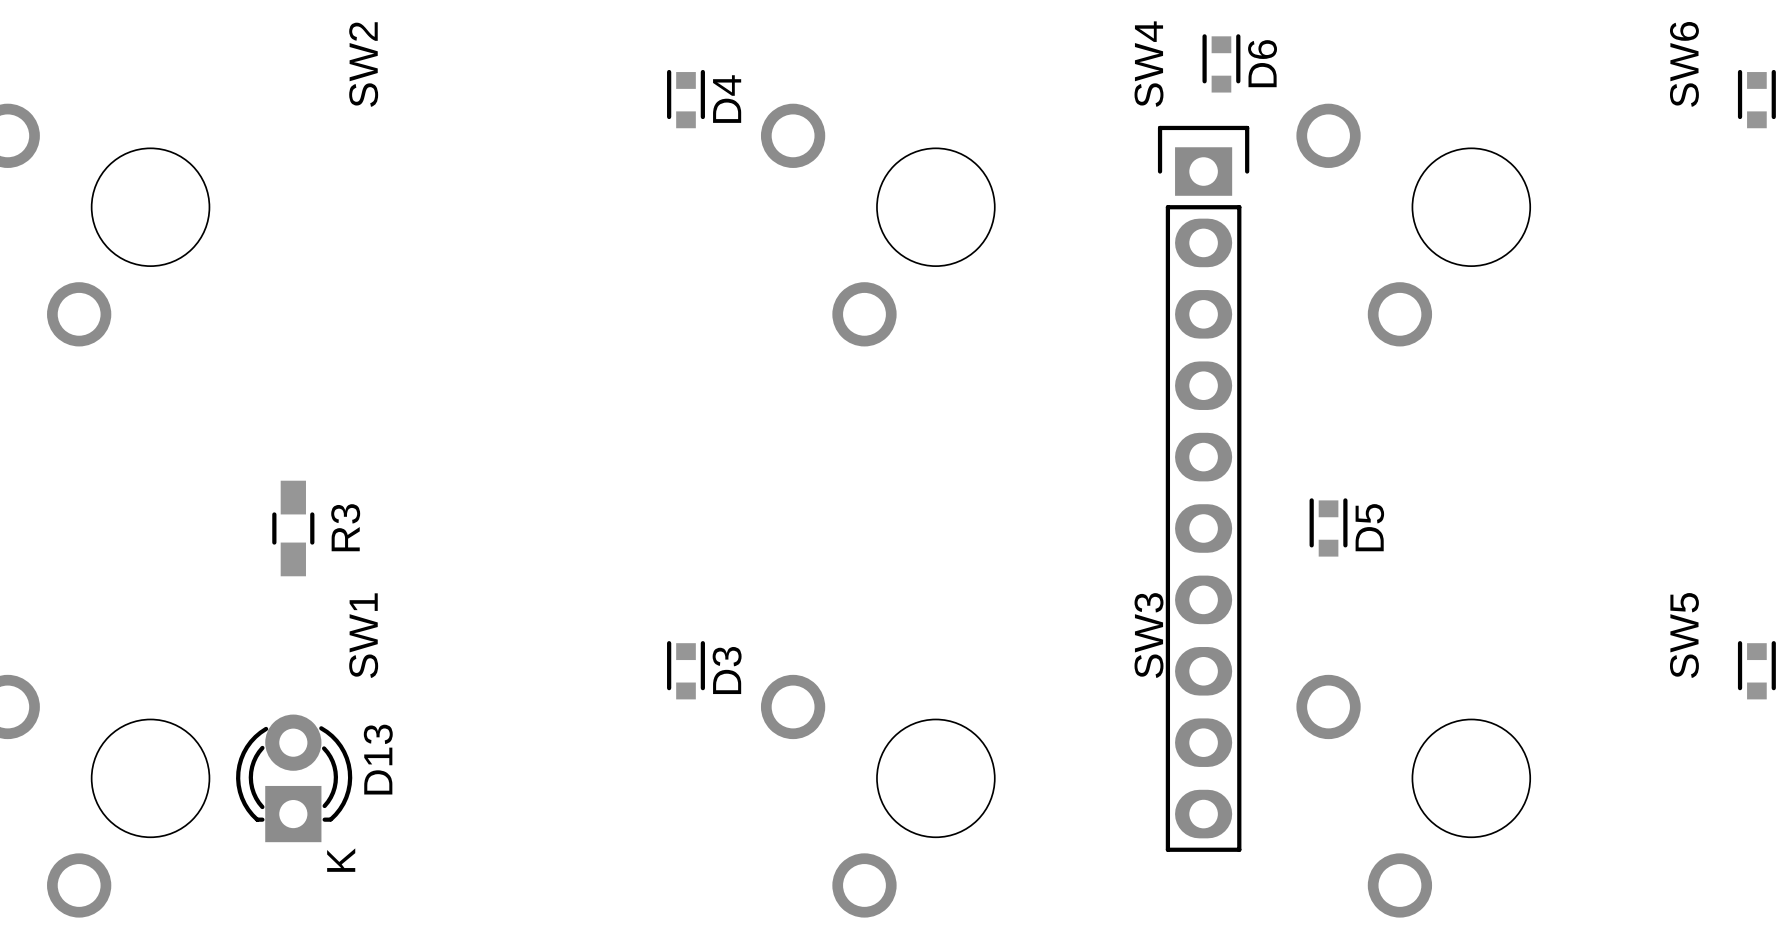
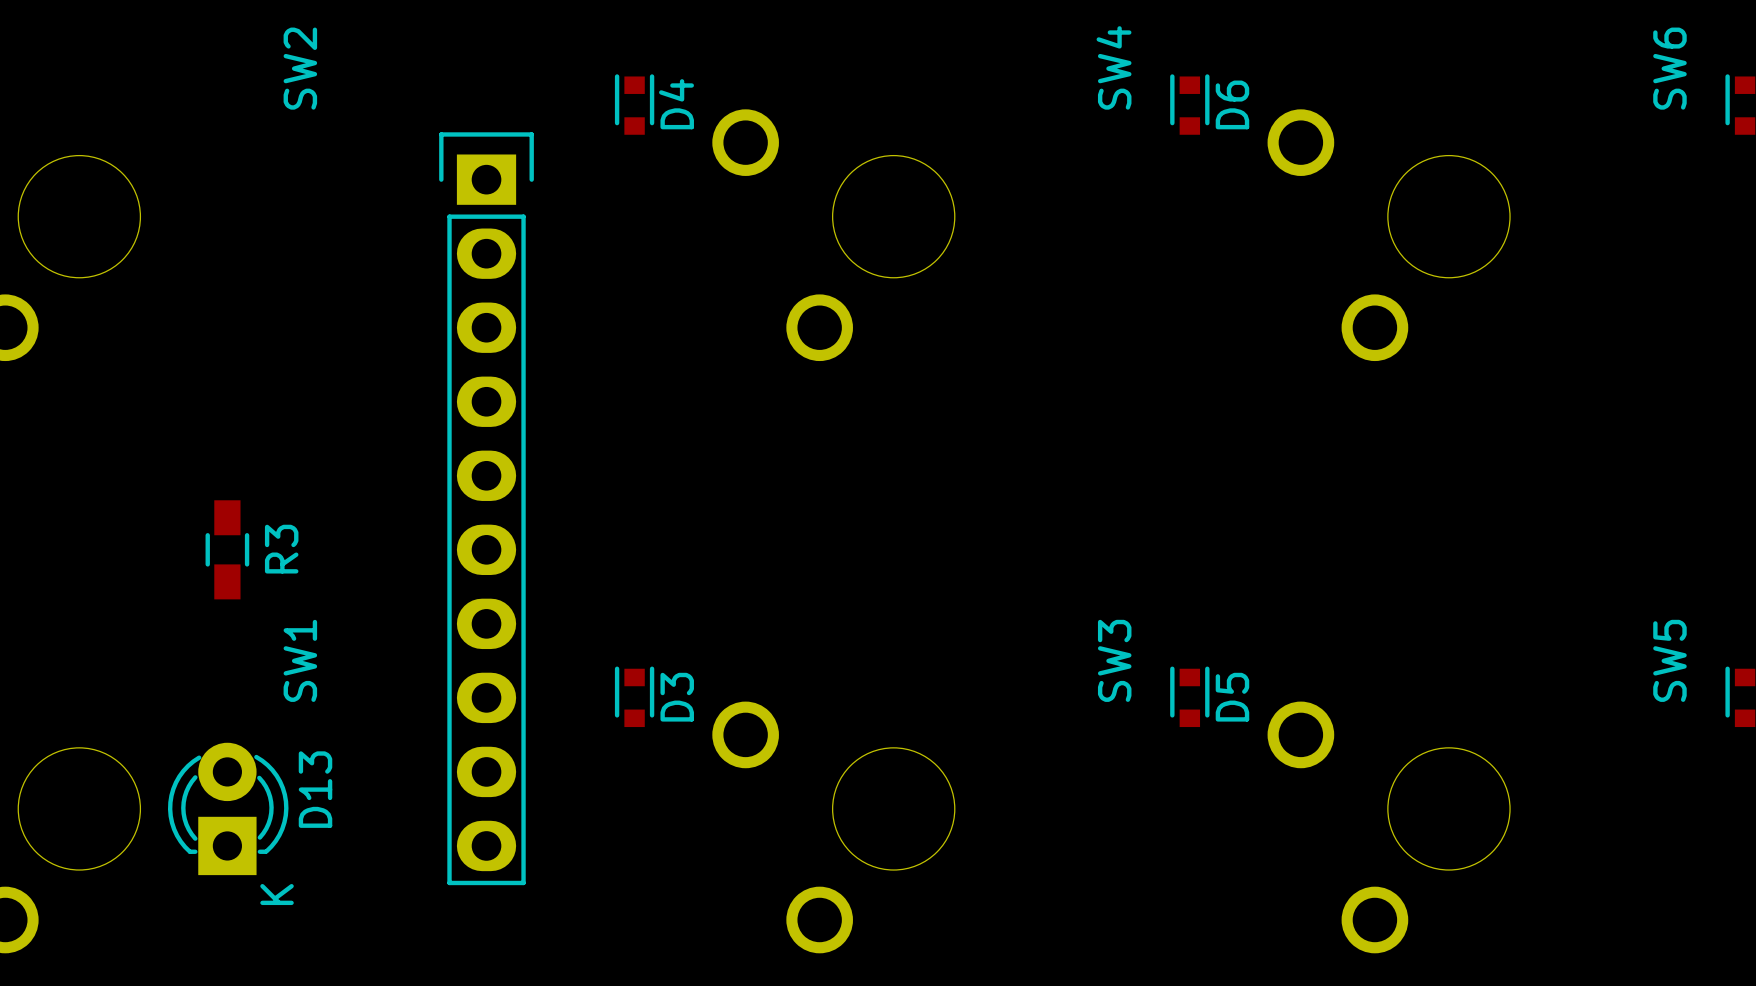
D6 position: (1221, 63) -> (1189, 104)
part position: (1203, 488) -> (486, 508)
D5 position: (1328, 527) -> (1189, 696)

